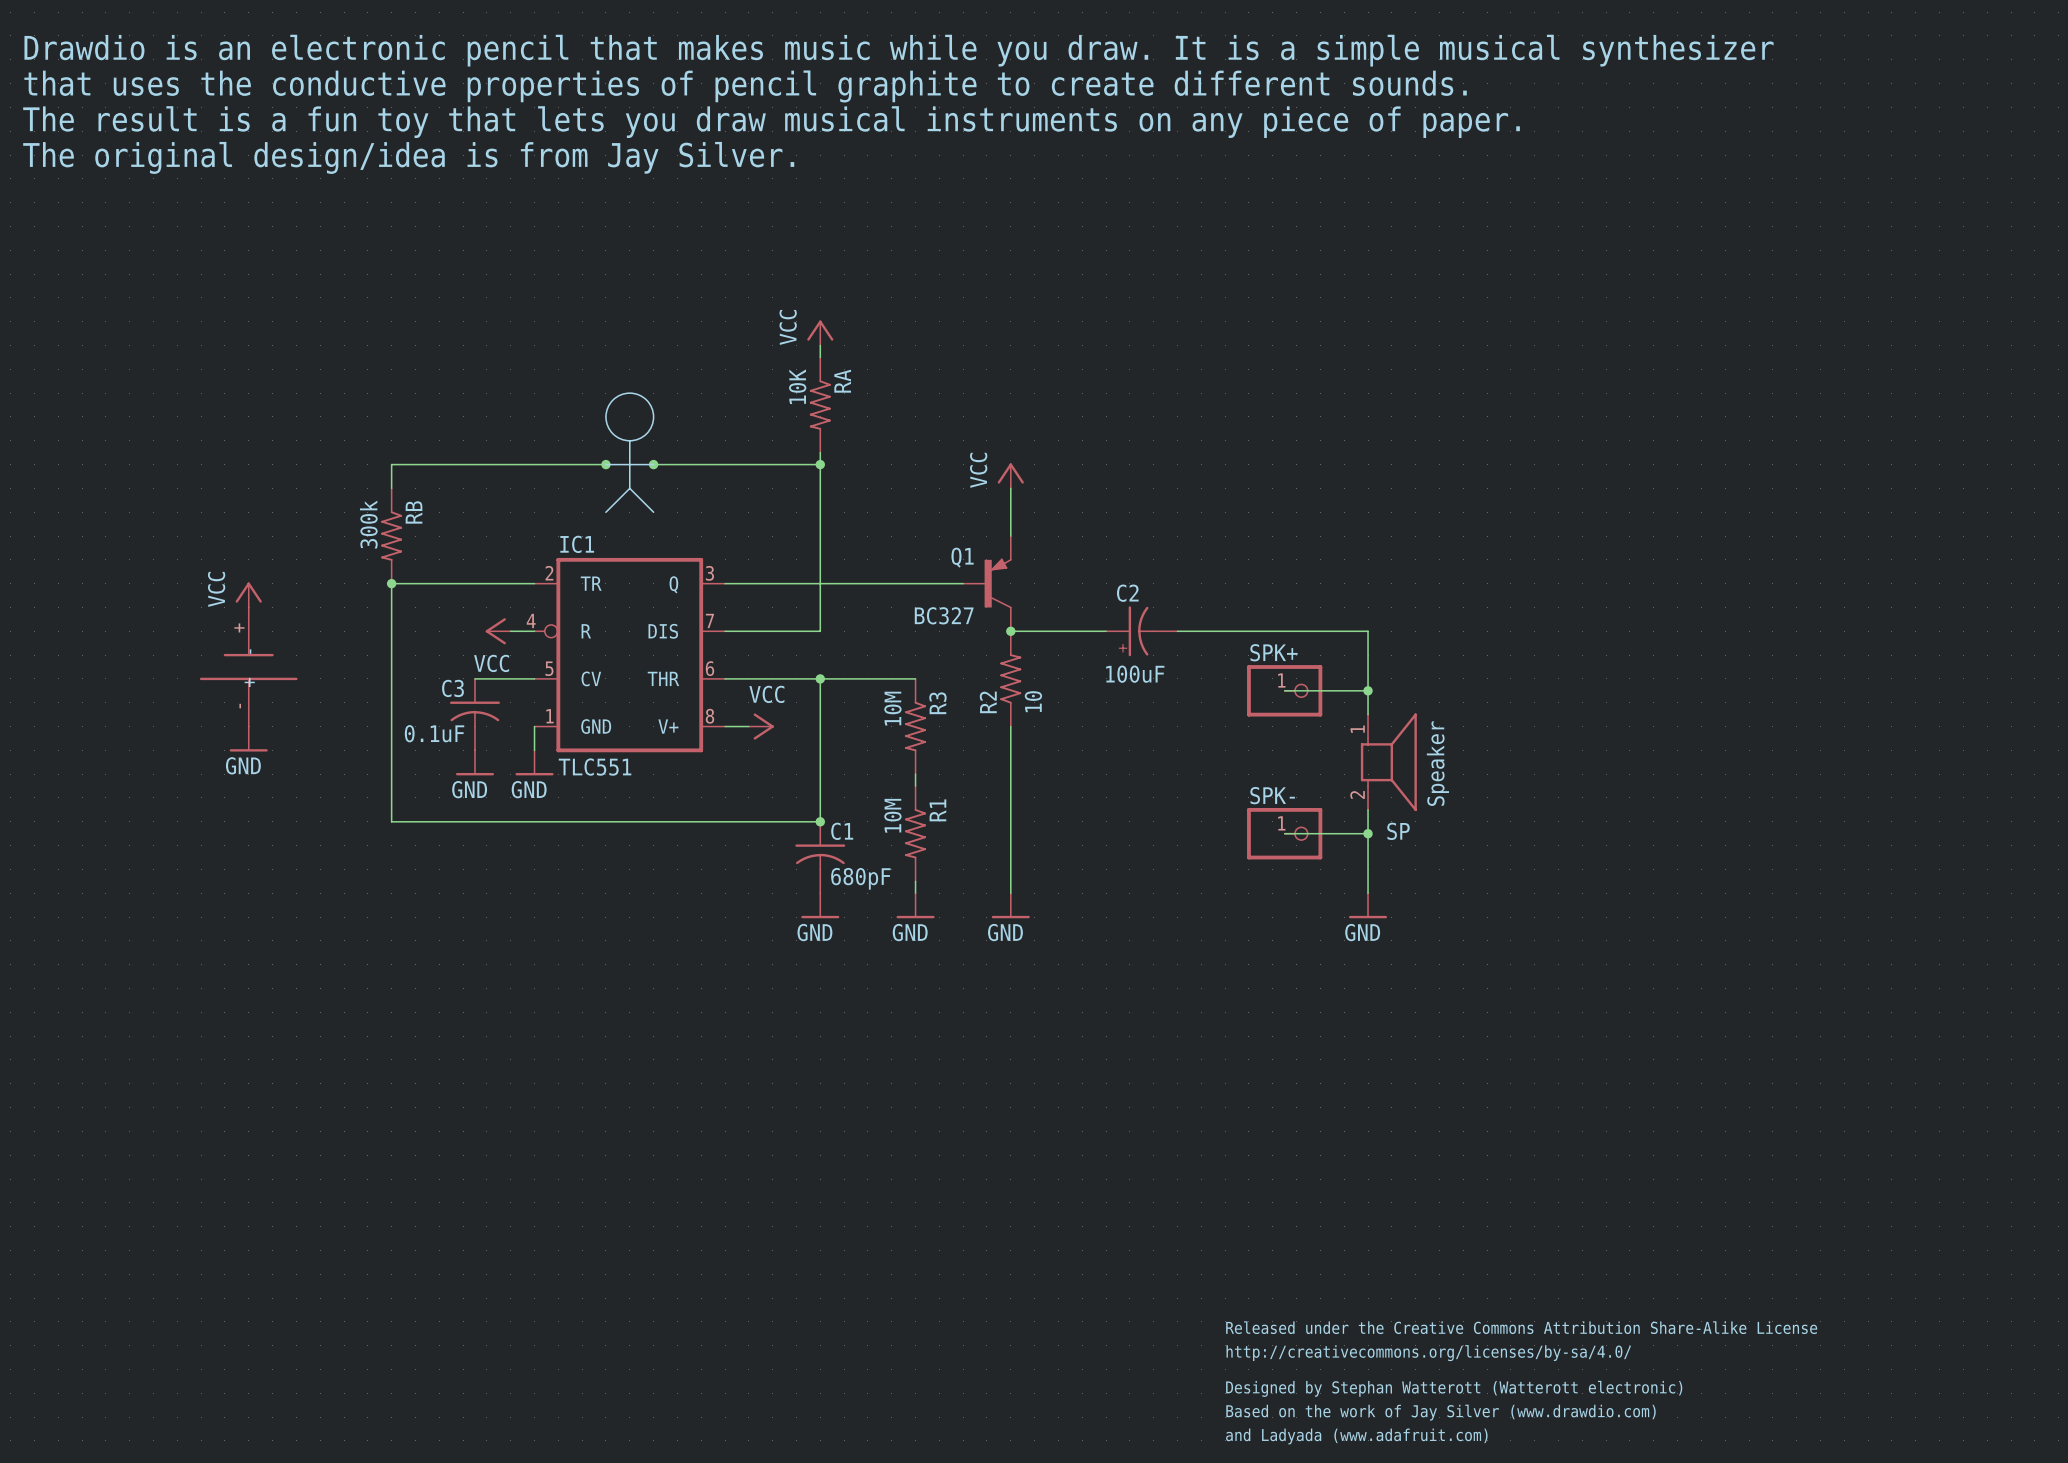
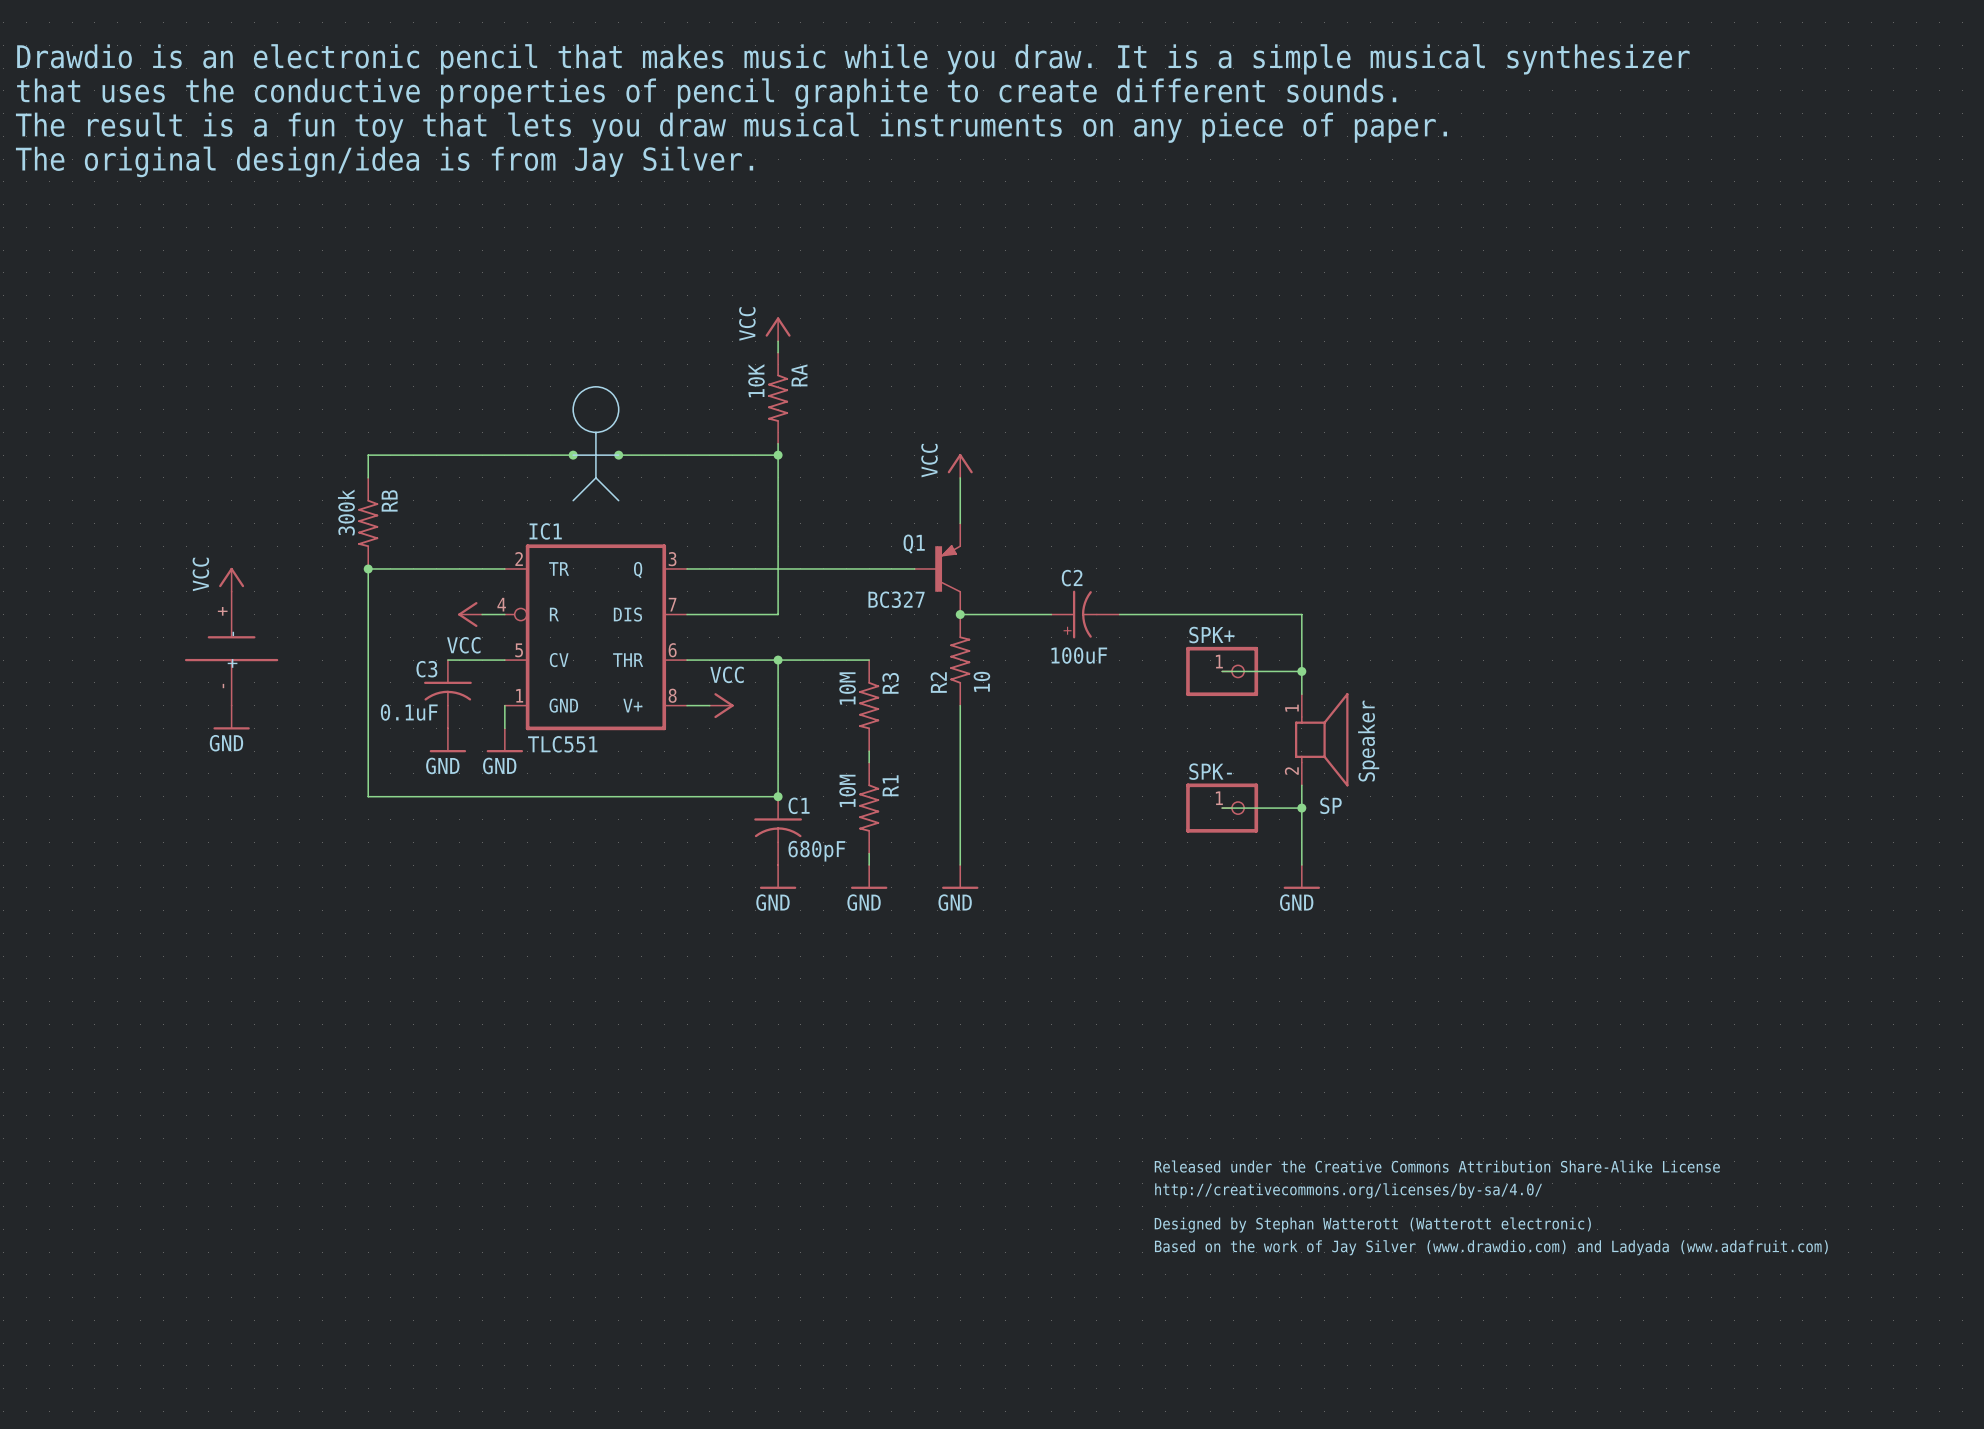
text: none -> Based on the work of Jay Silver (www.drawdio.com) and Ladyada (www.adafruit.com) (1491, 1247)
text position: Released under the Creative Commons Attribution Share-Alike License (1521, 1327) -> Released under the Creative Commons Attribution Share-Alike License (1437, 1166)
text position: http://creativecommons.org/licenses/by-sa/4.0/ (1428, 1353) -> http://creativecommons.org/licenses/by-sa/4.0/ (1348, 1190)
text position: Designed by Stephan Watterott (Watterott electronic) (1454, 1388) -> Designed by Stephan Watterott (Watterott electronic) (1372, 1225)
text: Based on the work of Jay Silver (www.drawdio.com) (1441, 1412) -> none
text: and Ladyada (www.adafruit.com) (1356, 1436) -> none

